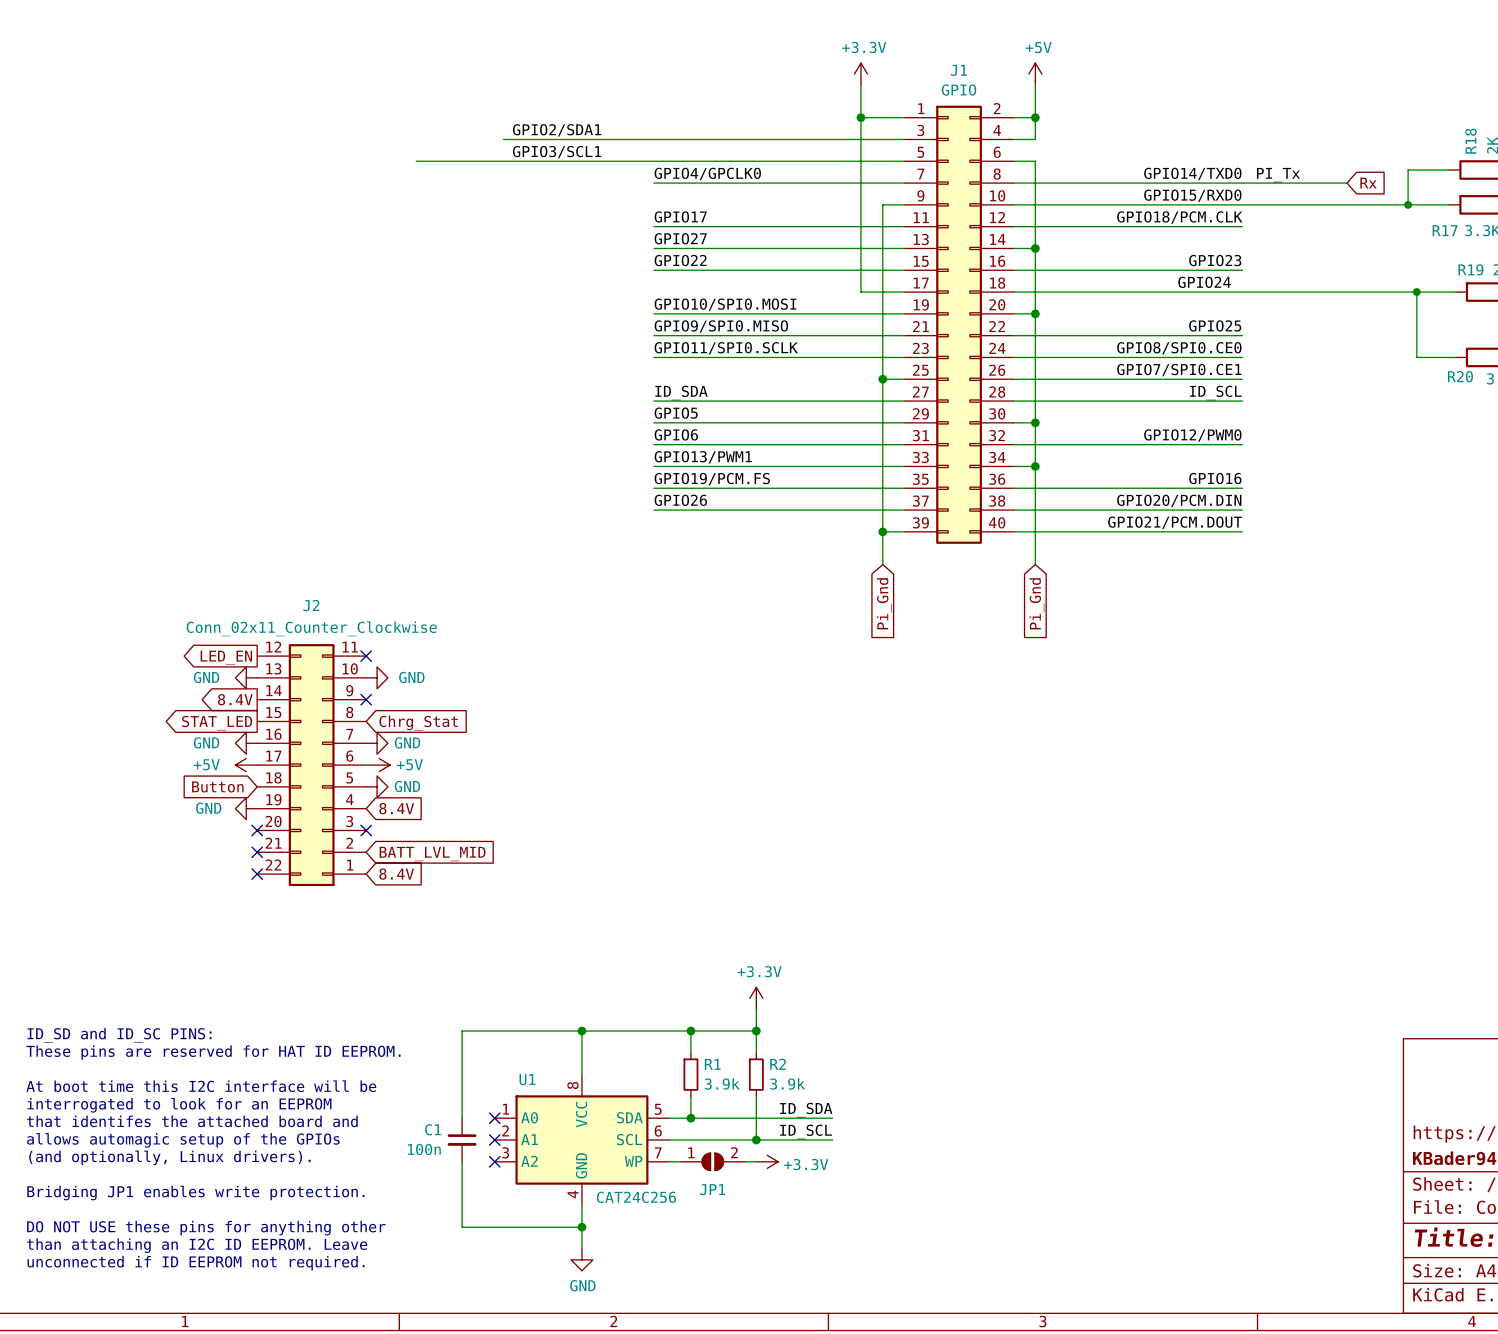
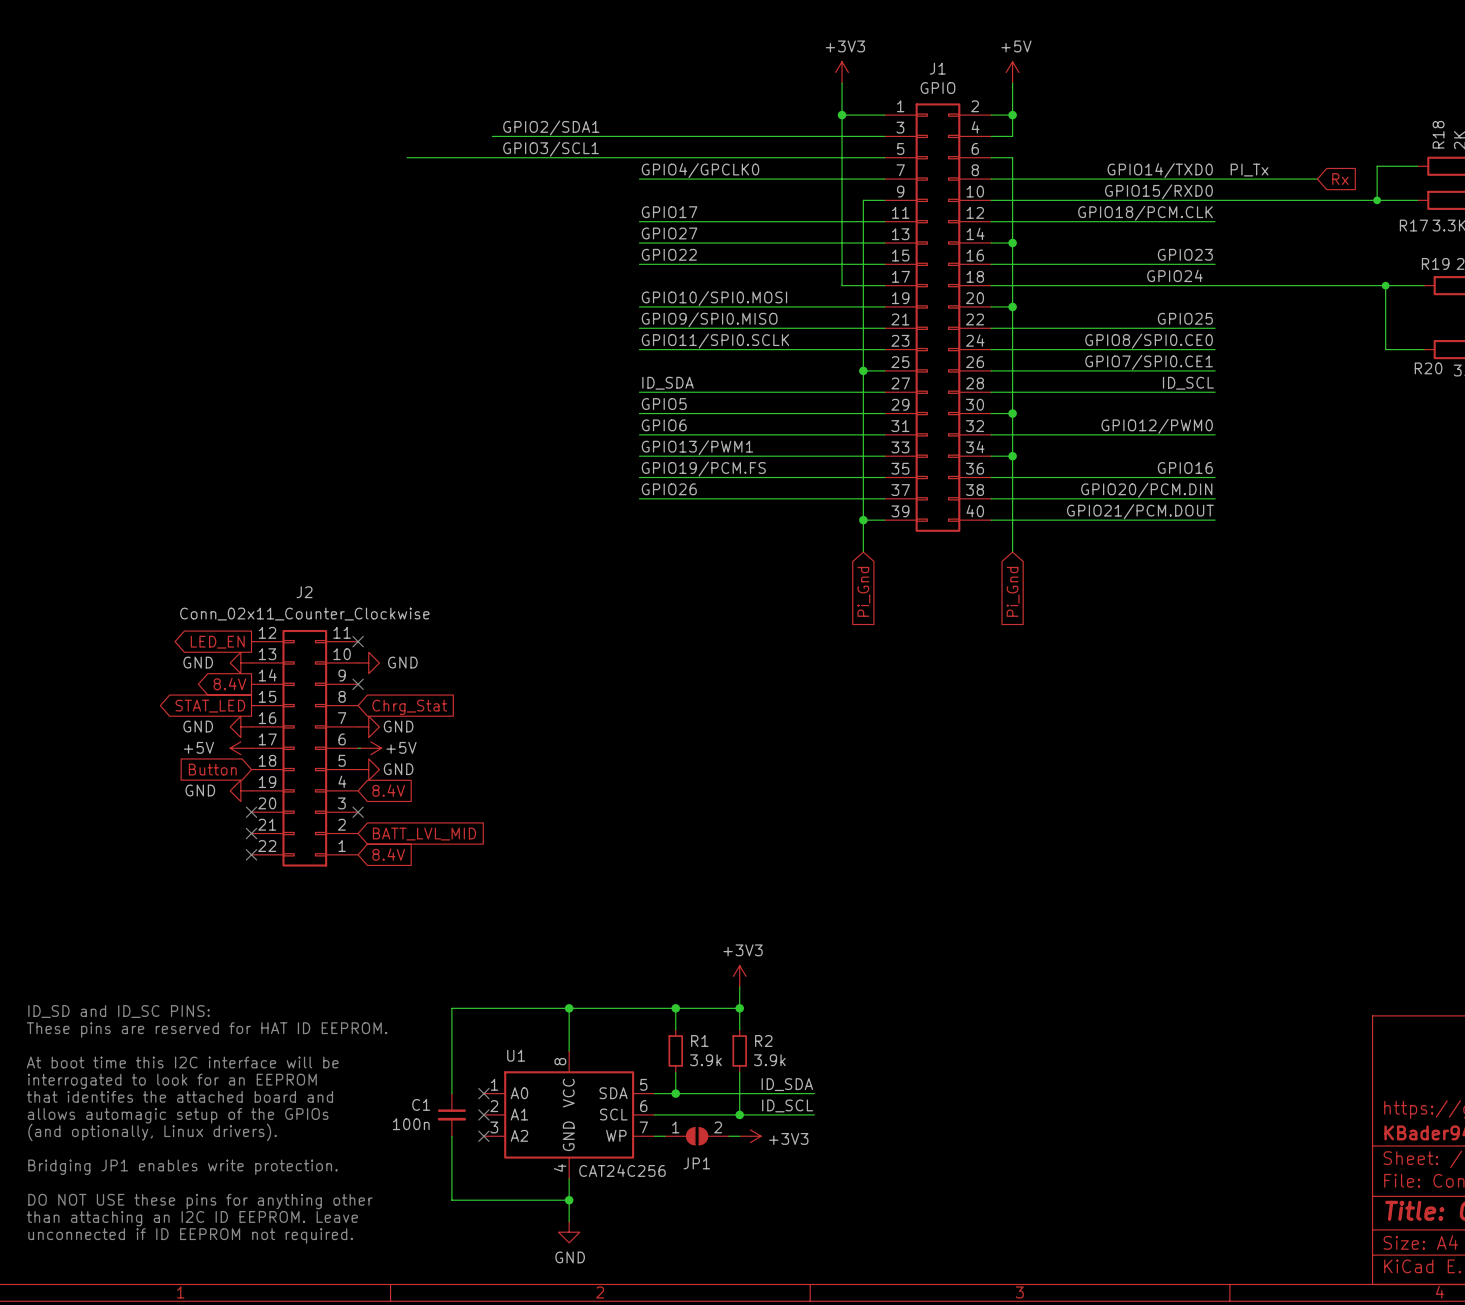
power symbol: +3.3V (860, 74) -> +3V3 (842, 72)
power symbol: +3.3V (756, 998) -> +3V3 (739, 976)
power symbol: +3.3V (767, 1161) -> +3V3 (750, 1136)

